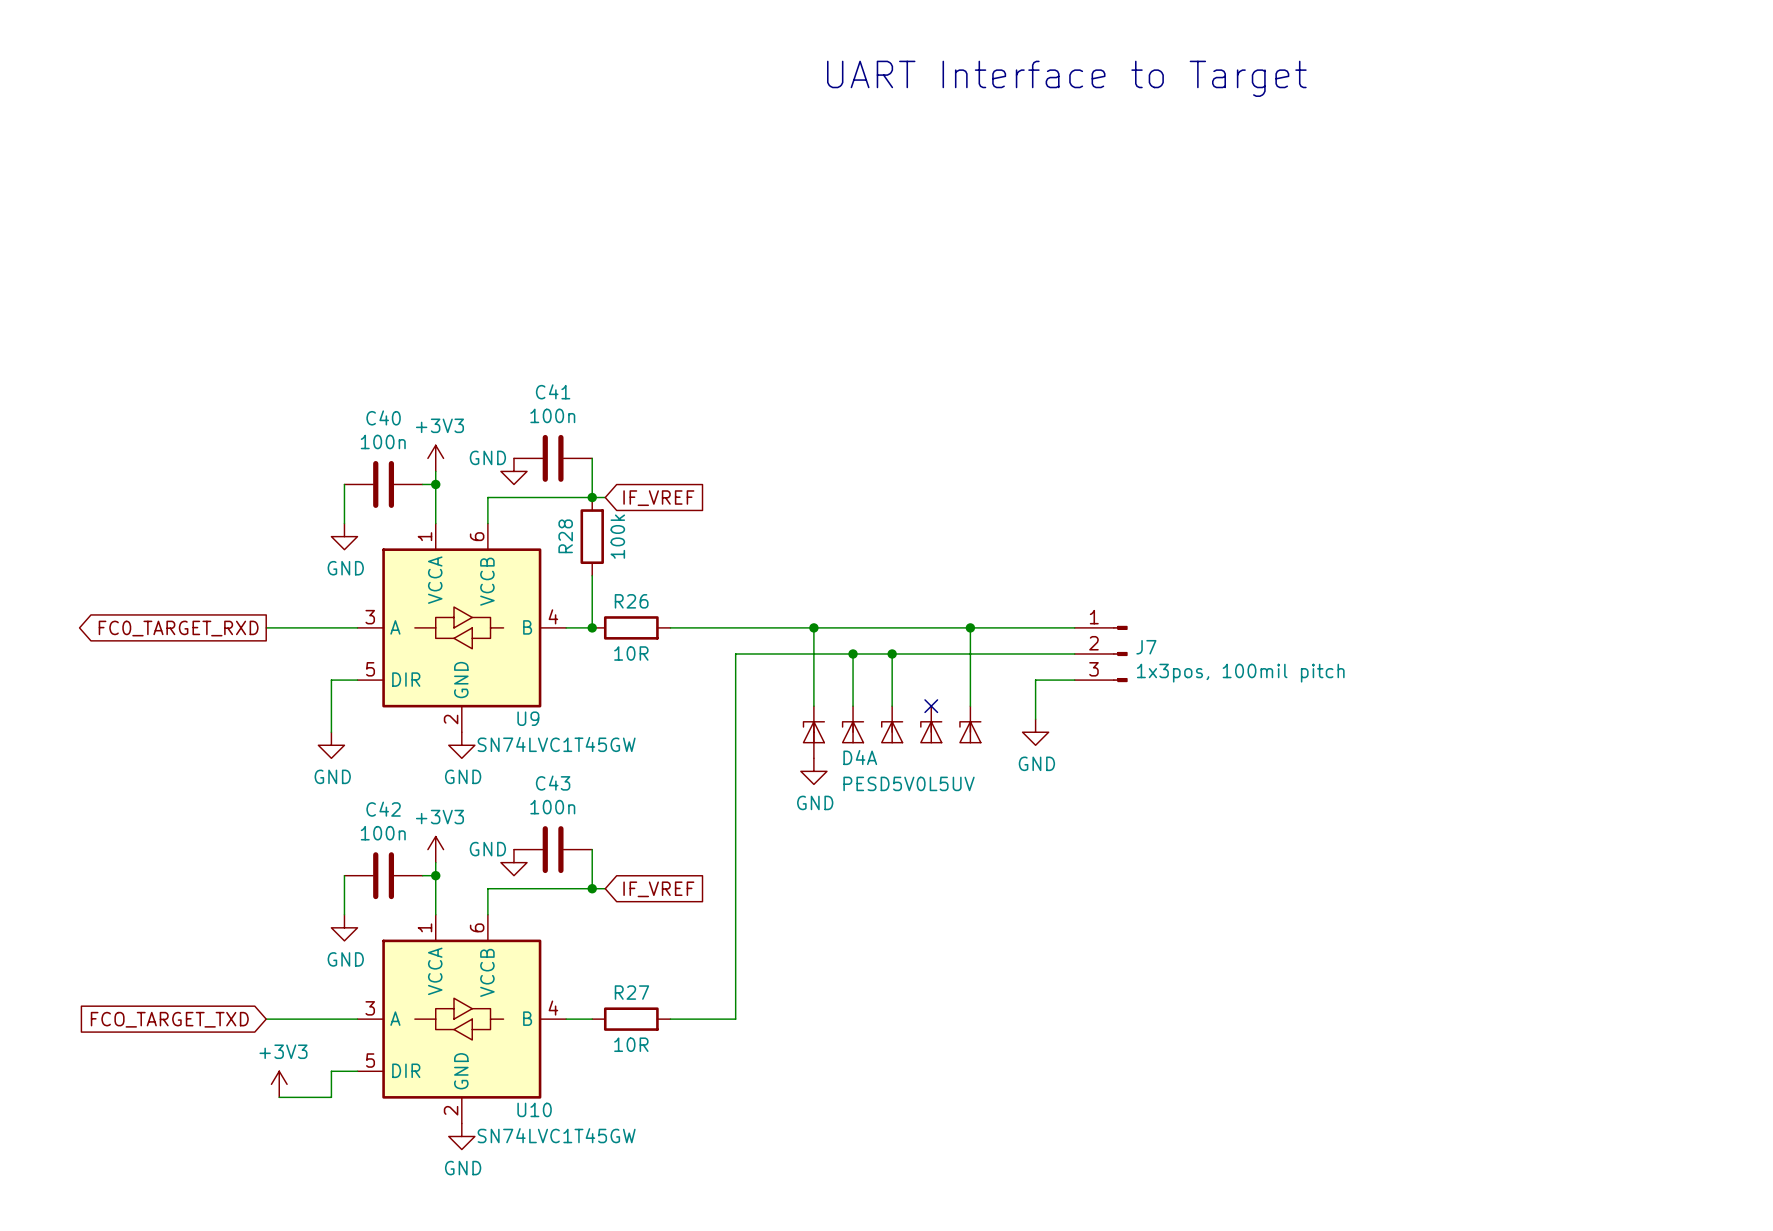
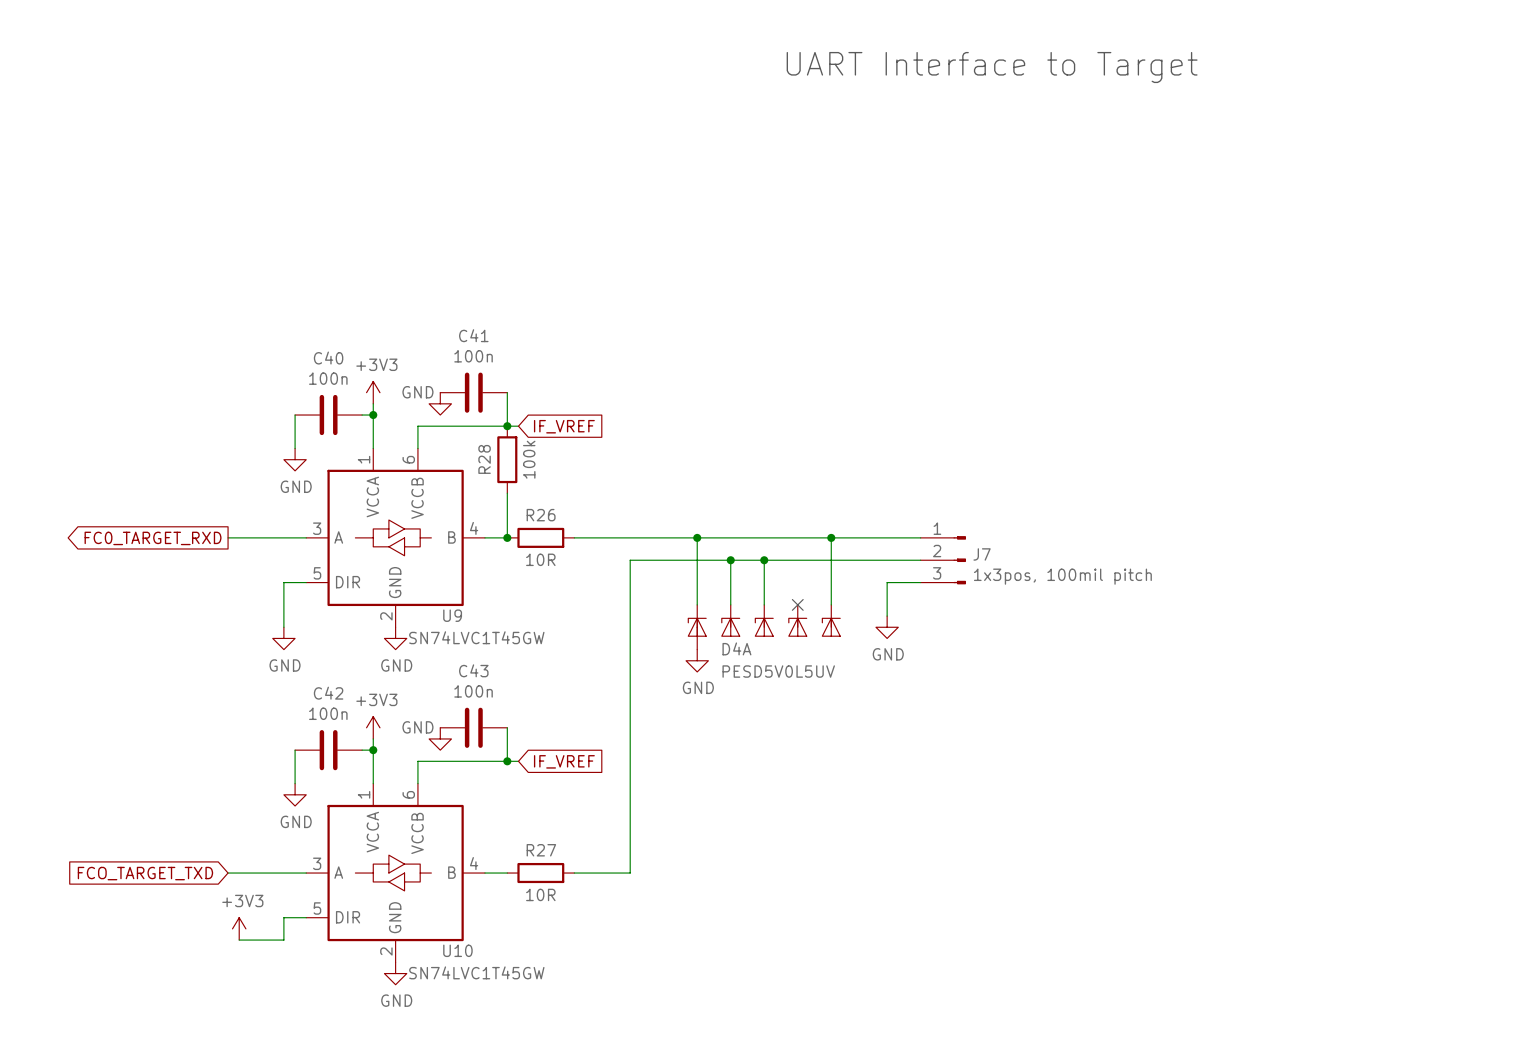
text position: UART Interface to Target (1066, 78) -> UART Interface to Target (992, 67)

